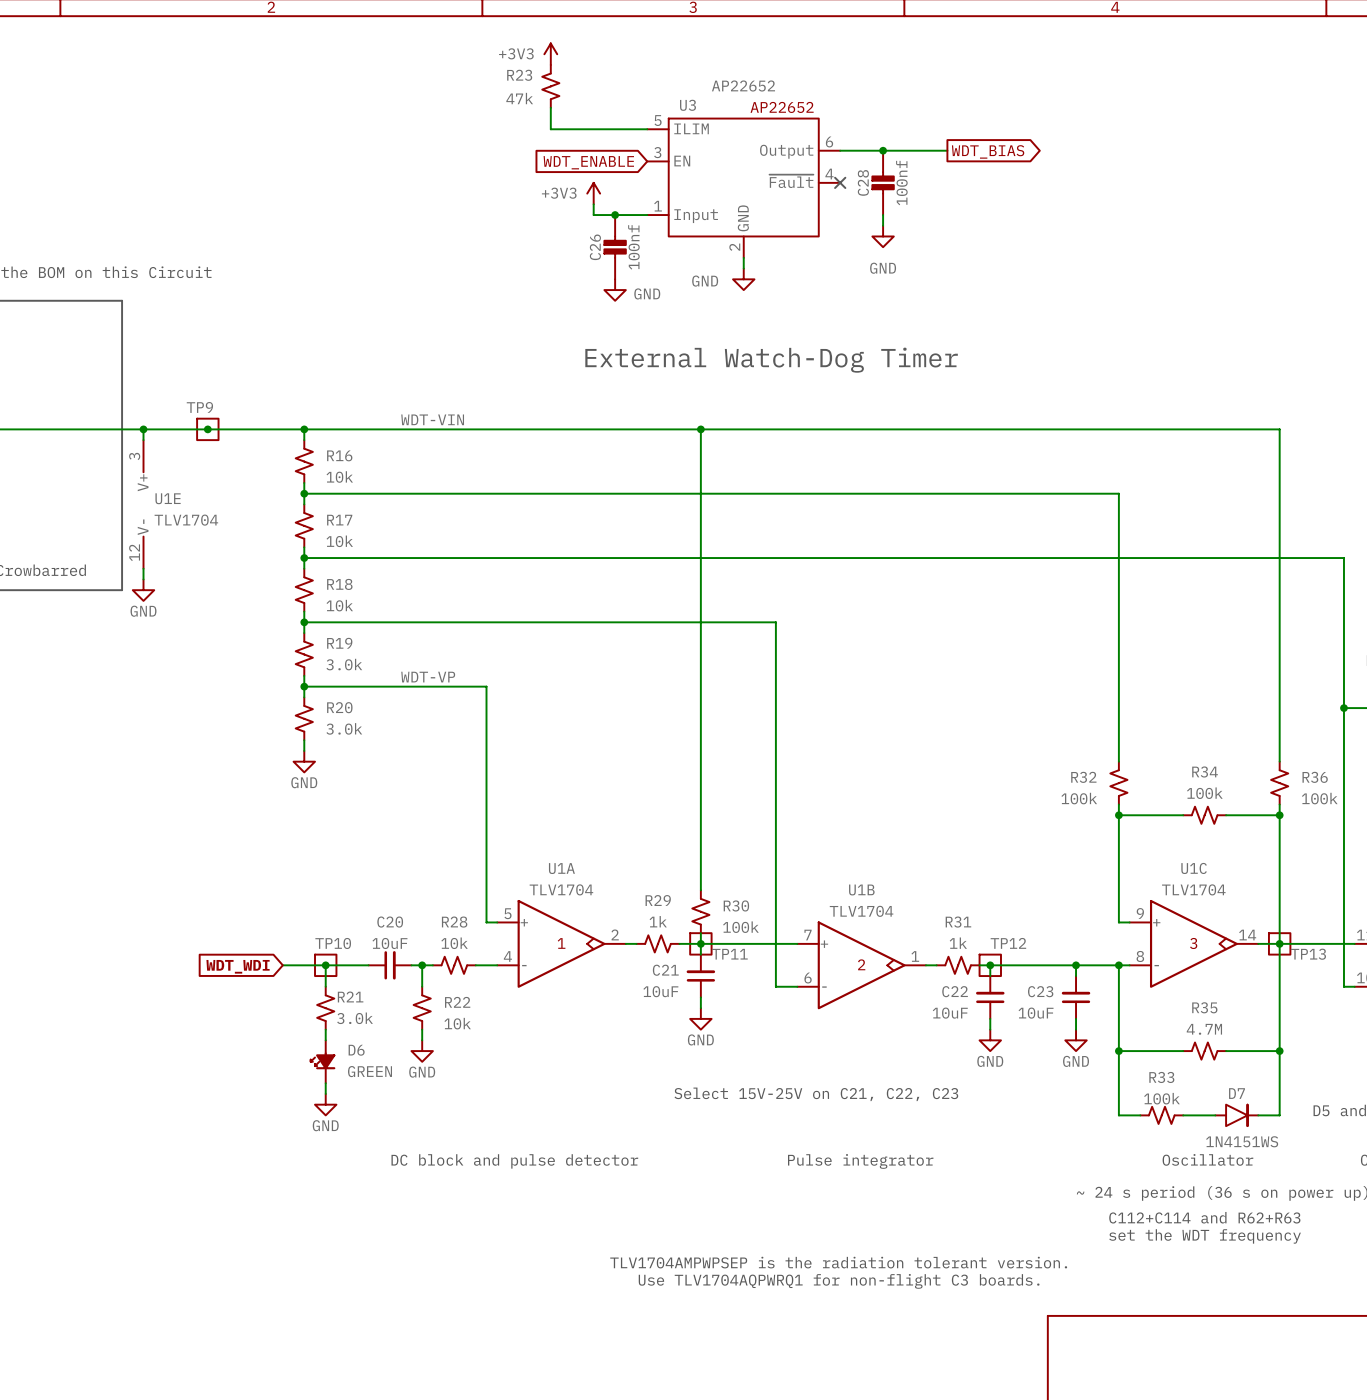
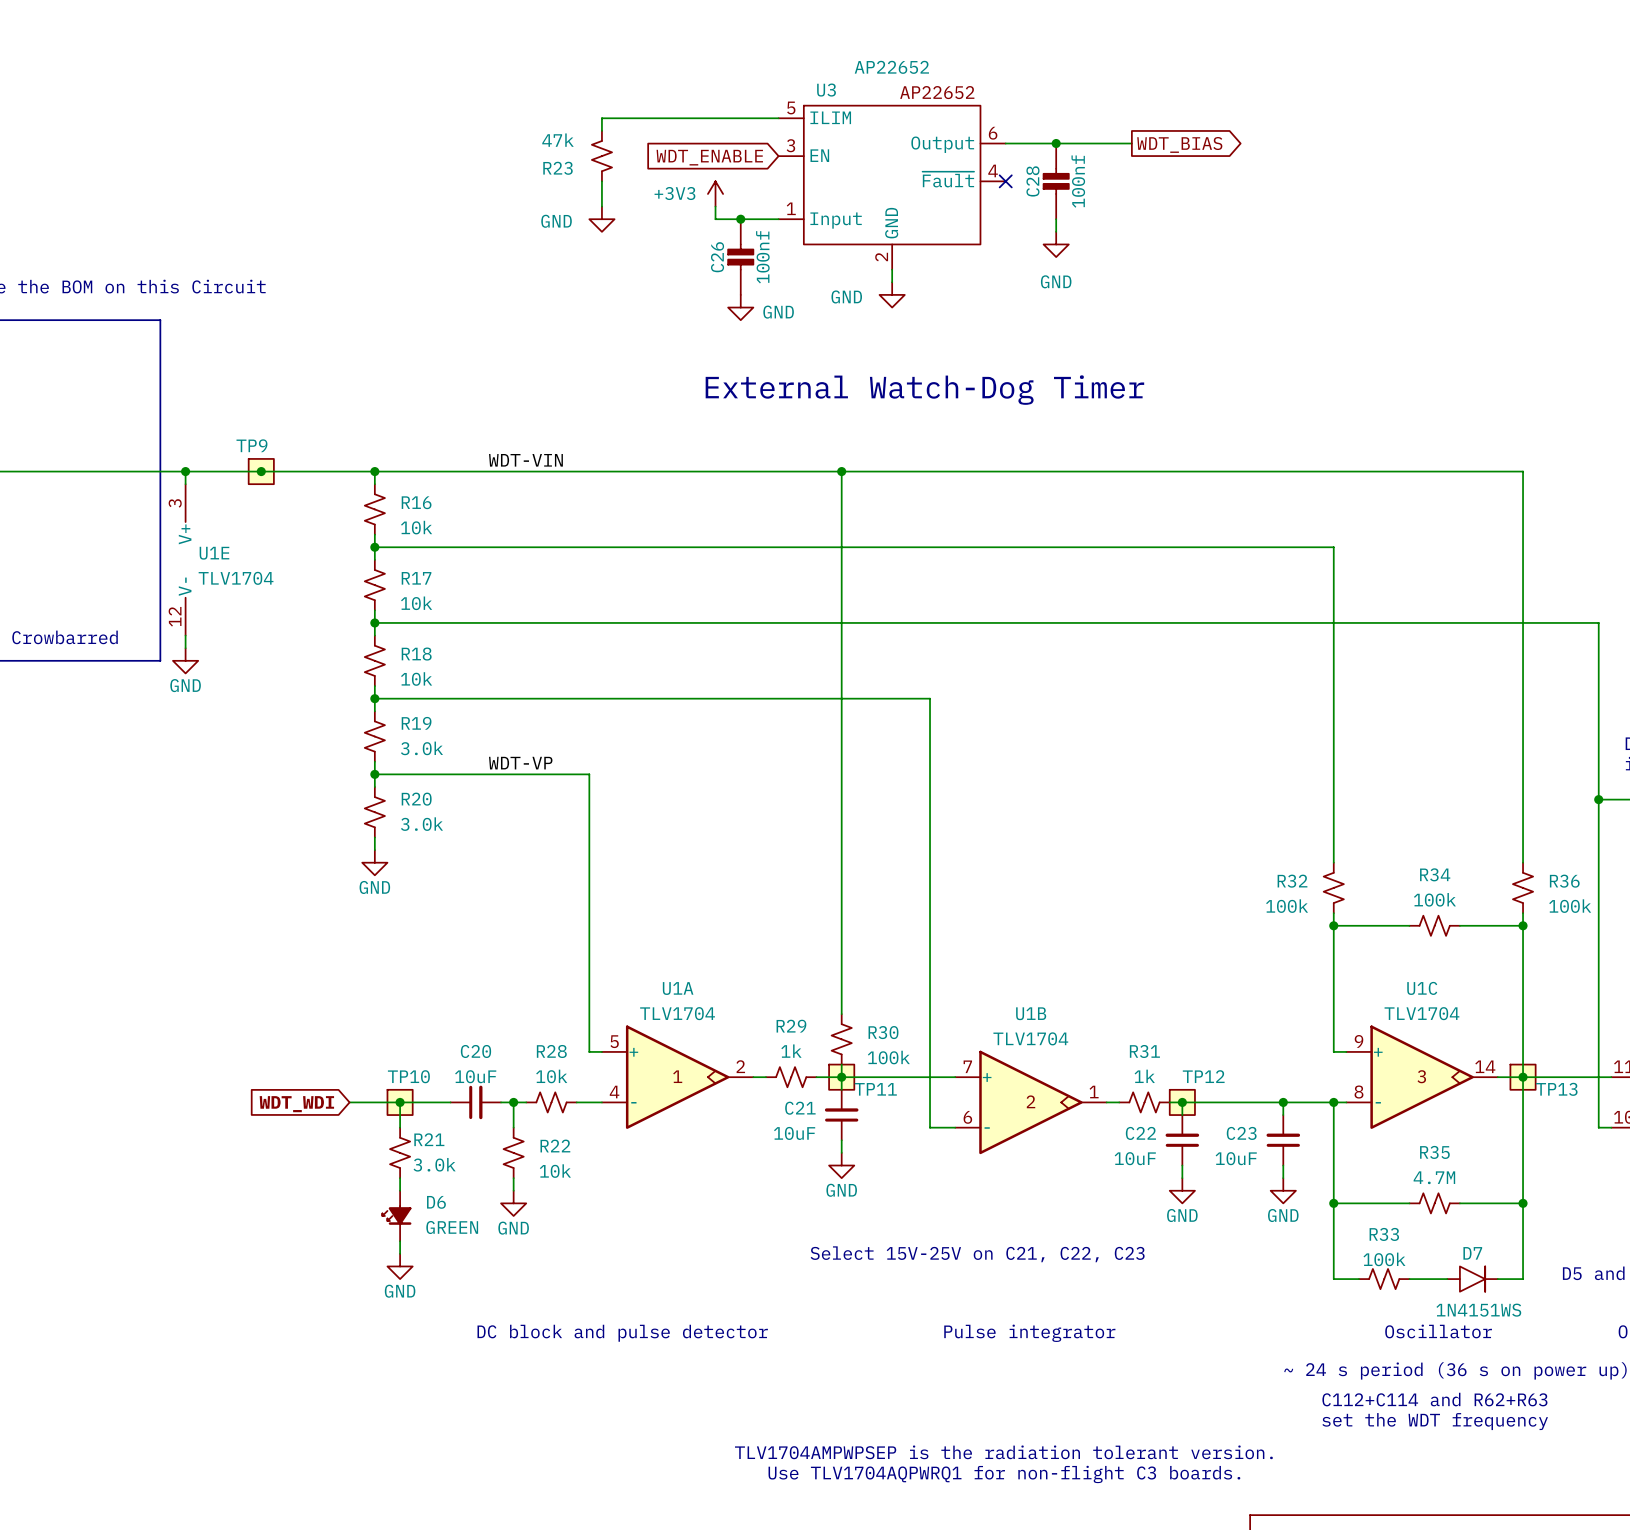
power symbol: +3V3 (550, 54) -> none
R23 name position: R23 (519, 75) -> R23 (558, 168)
R23 position: (550, 86) -> (601, 156)
R23 value position: 47k (519, 98) -> 47k (558, 140)
wire: (550, 107) (550, 129) -> (601, 130) (601, 118) (665, 118)
wire: none -> (601, 181) (601, 206)
power symbol: none -> GND (601, 219)

